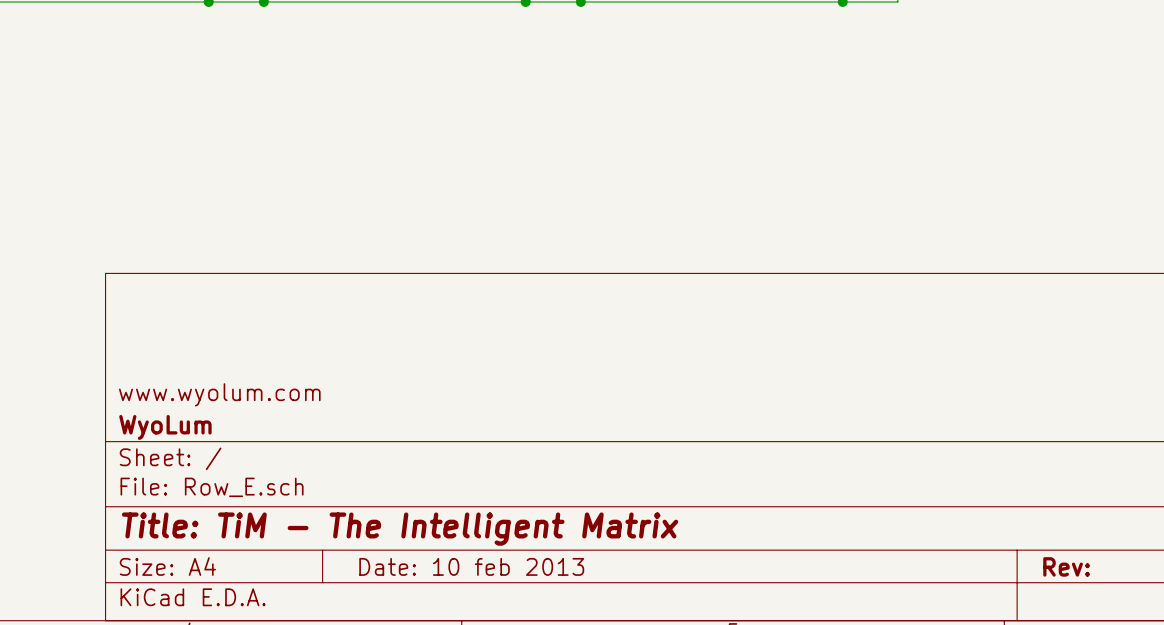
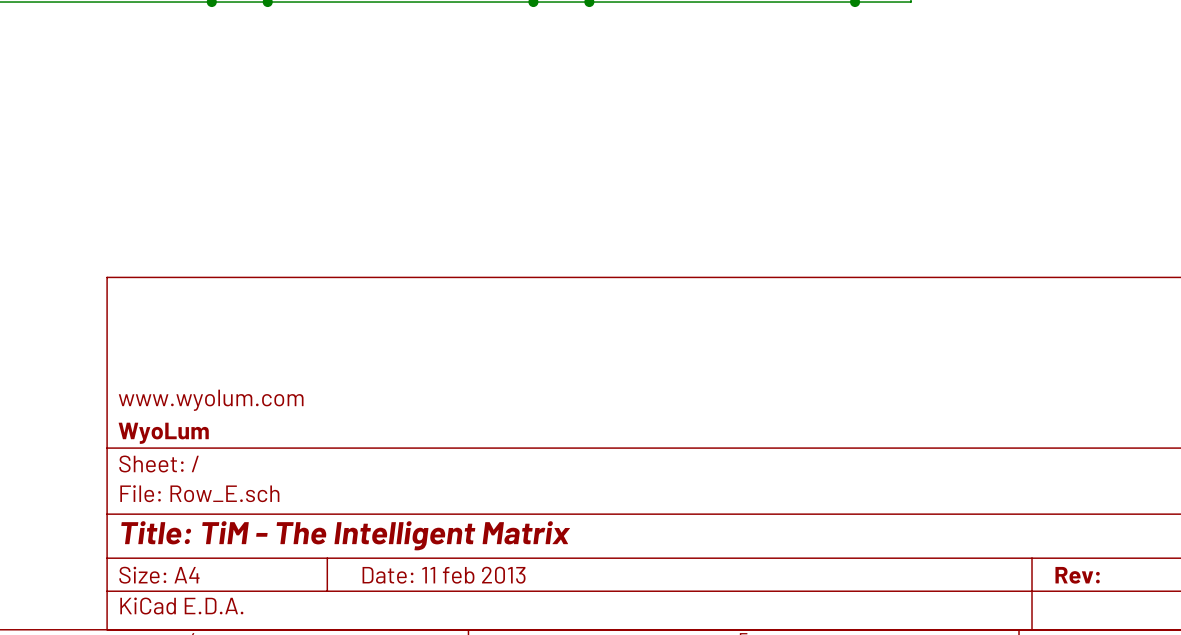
title block: Date: 10 feb 2013 (471, 566) -> Date: 11 feb 2013 (444, 575)

